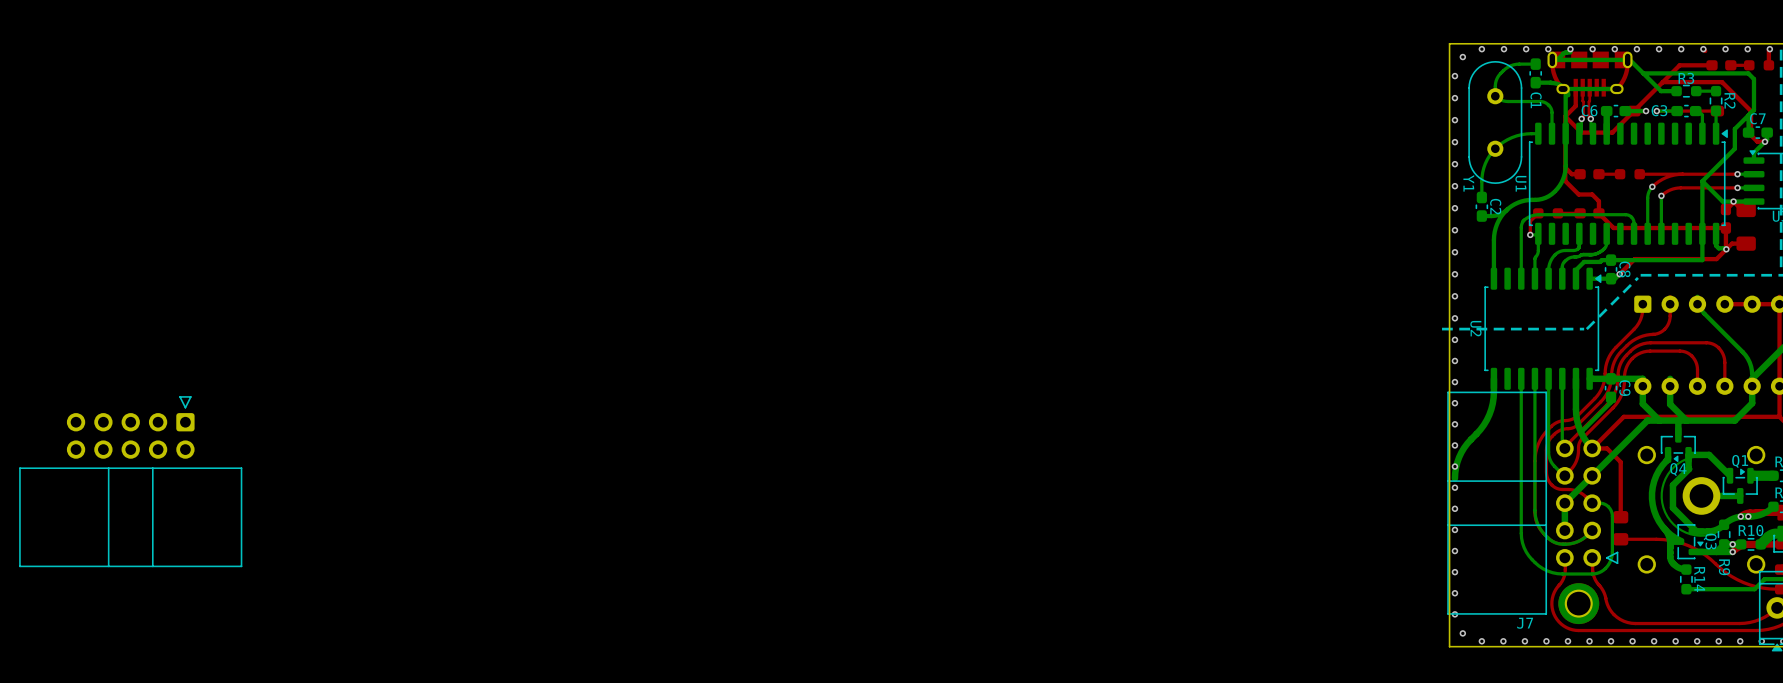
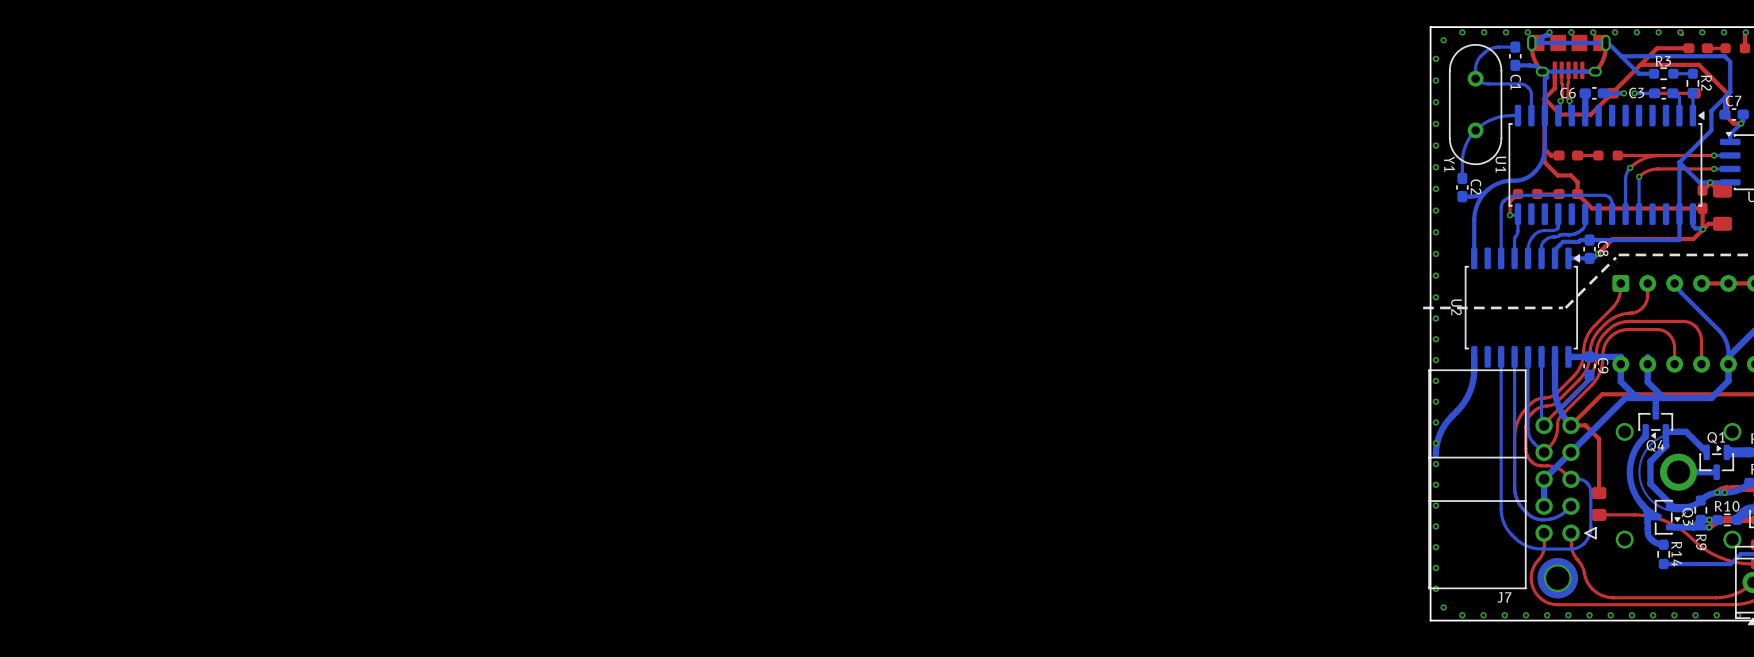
part: (130, 481) -> none

